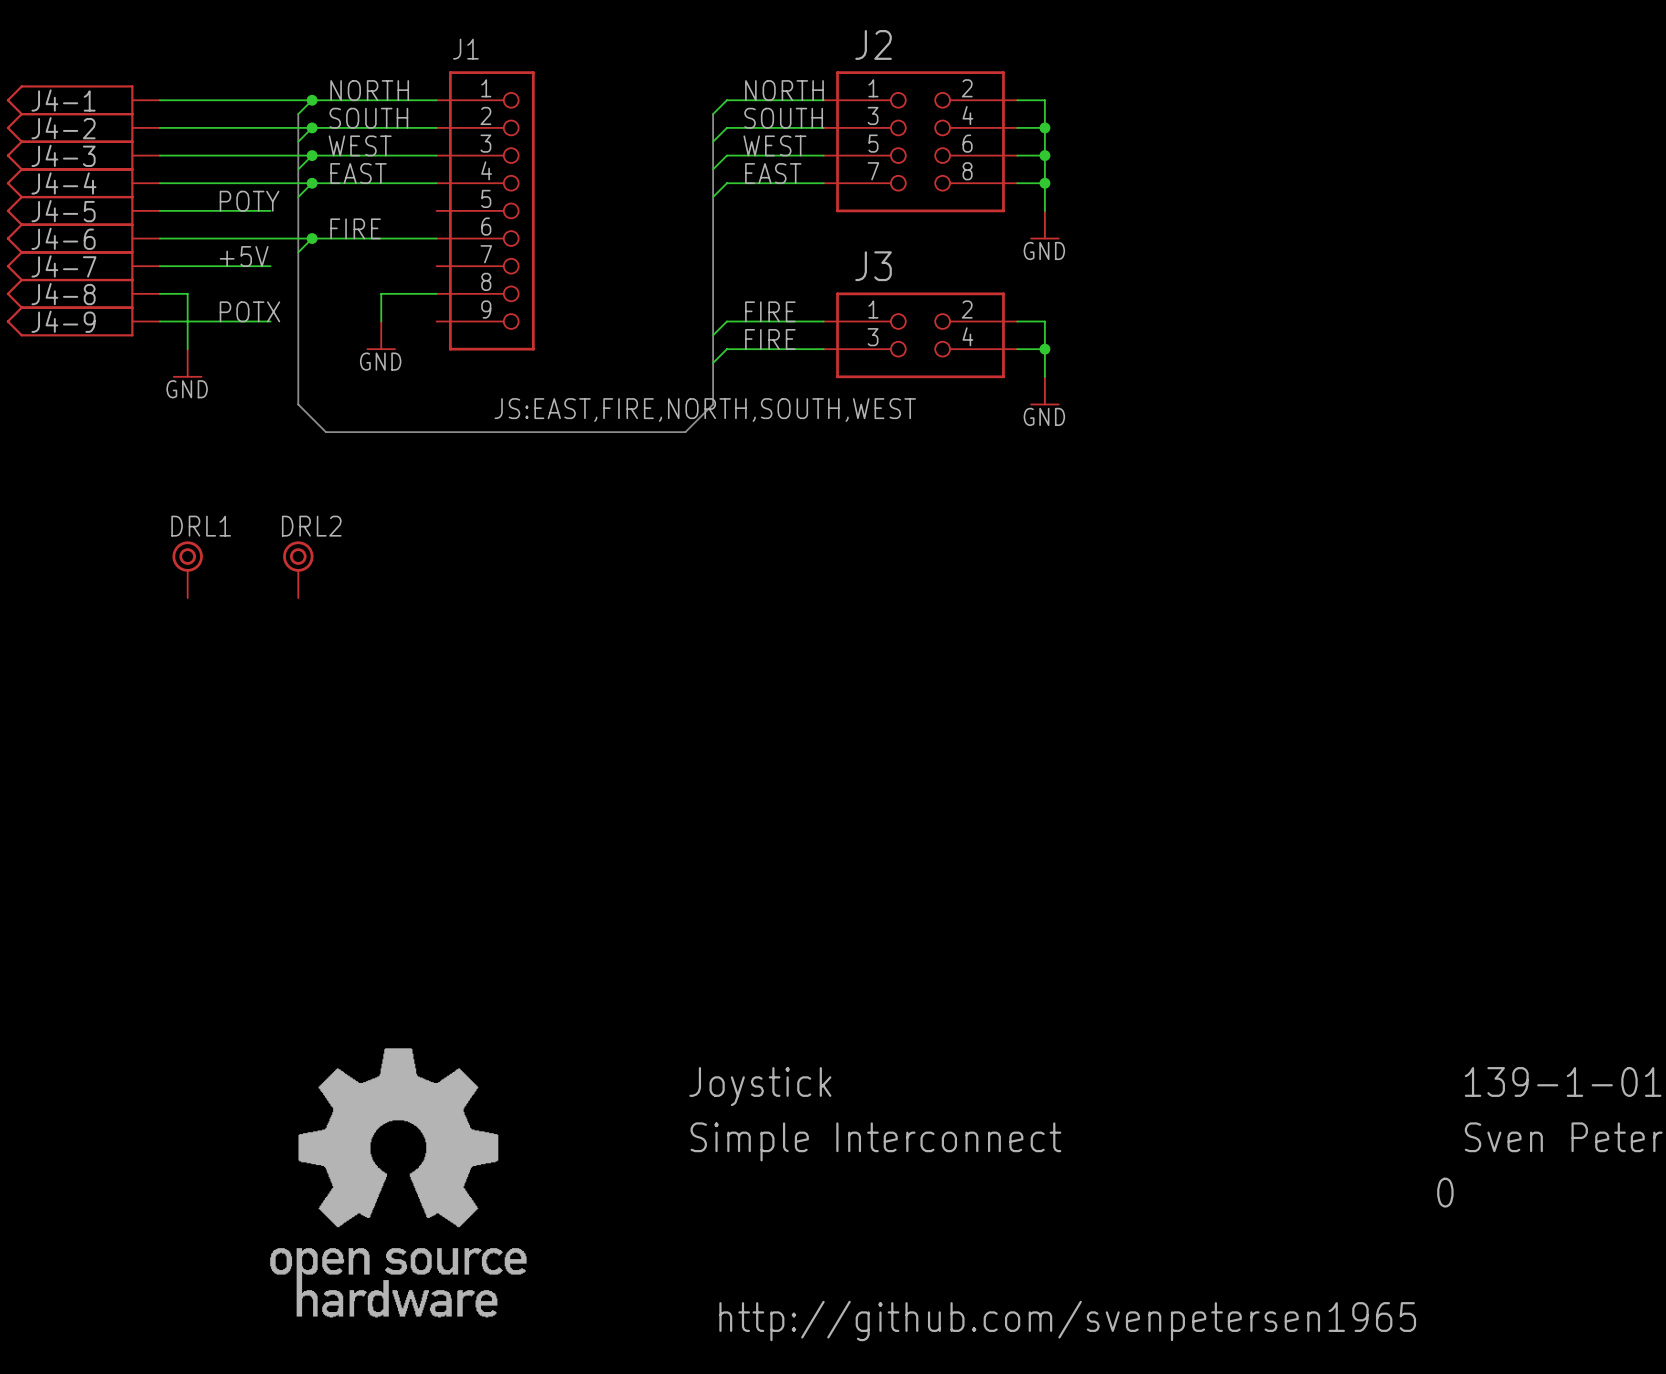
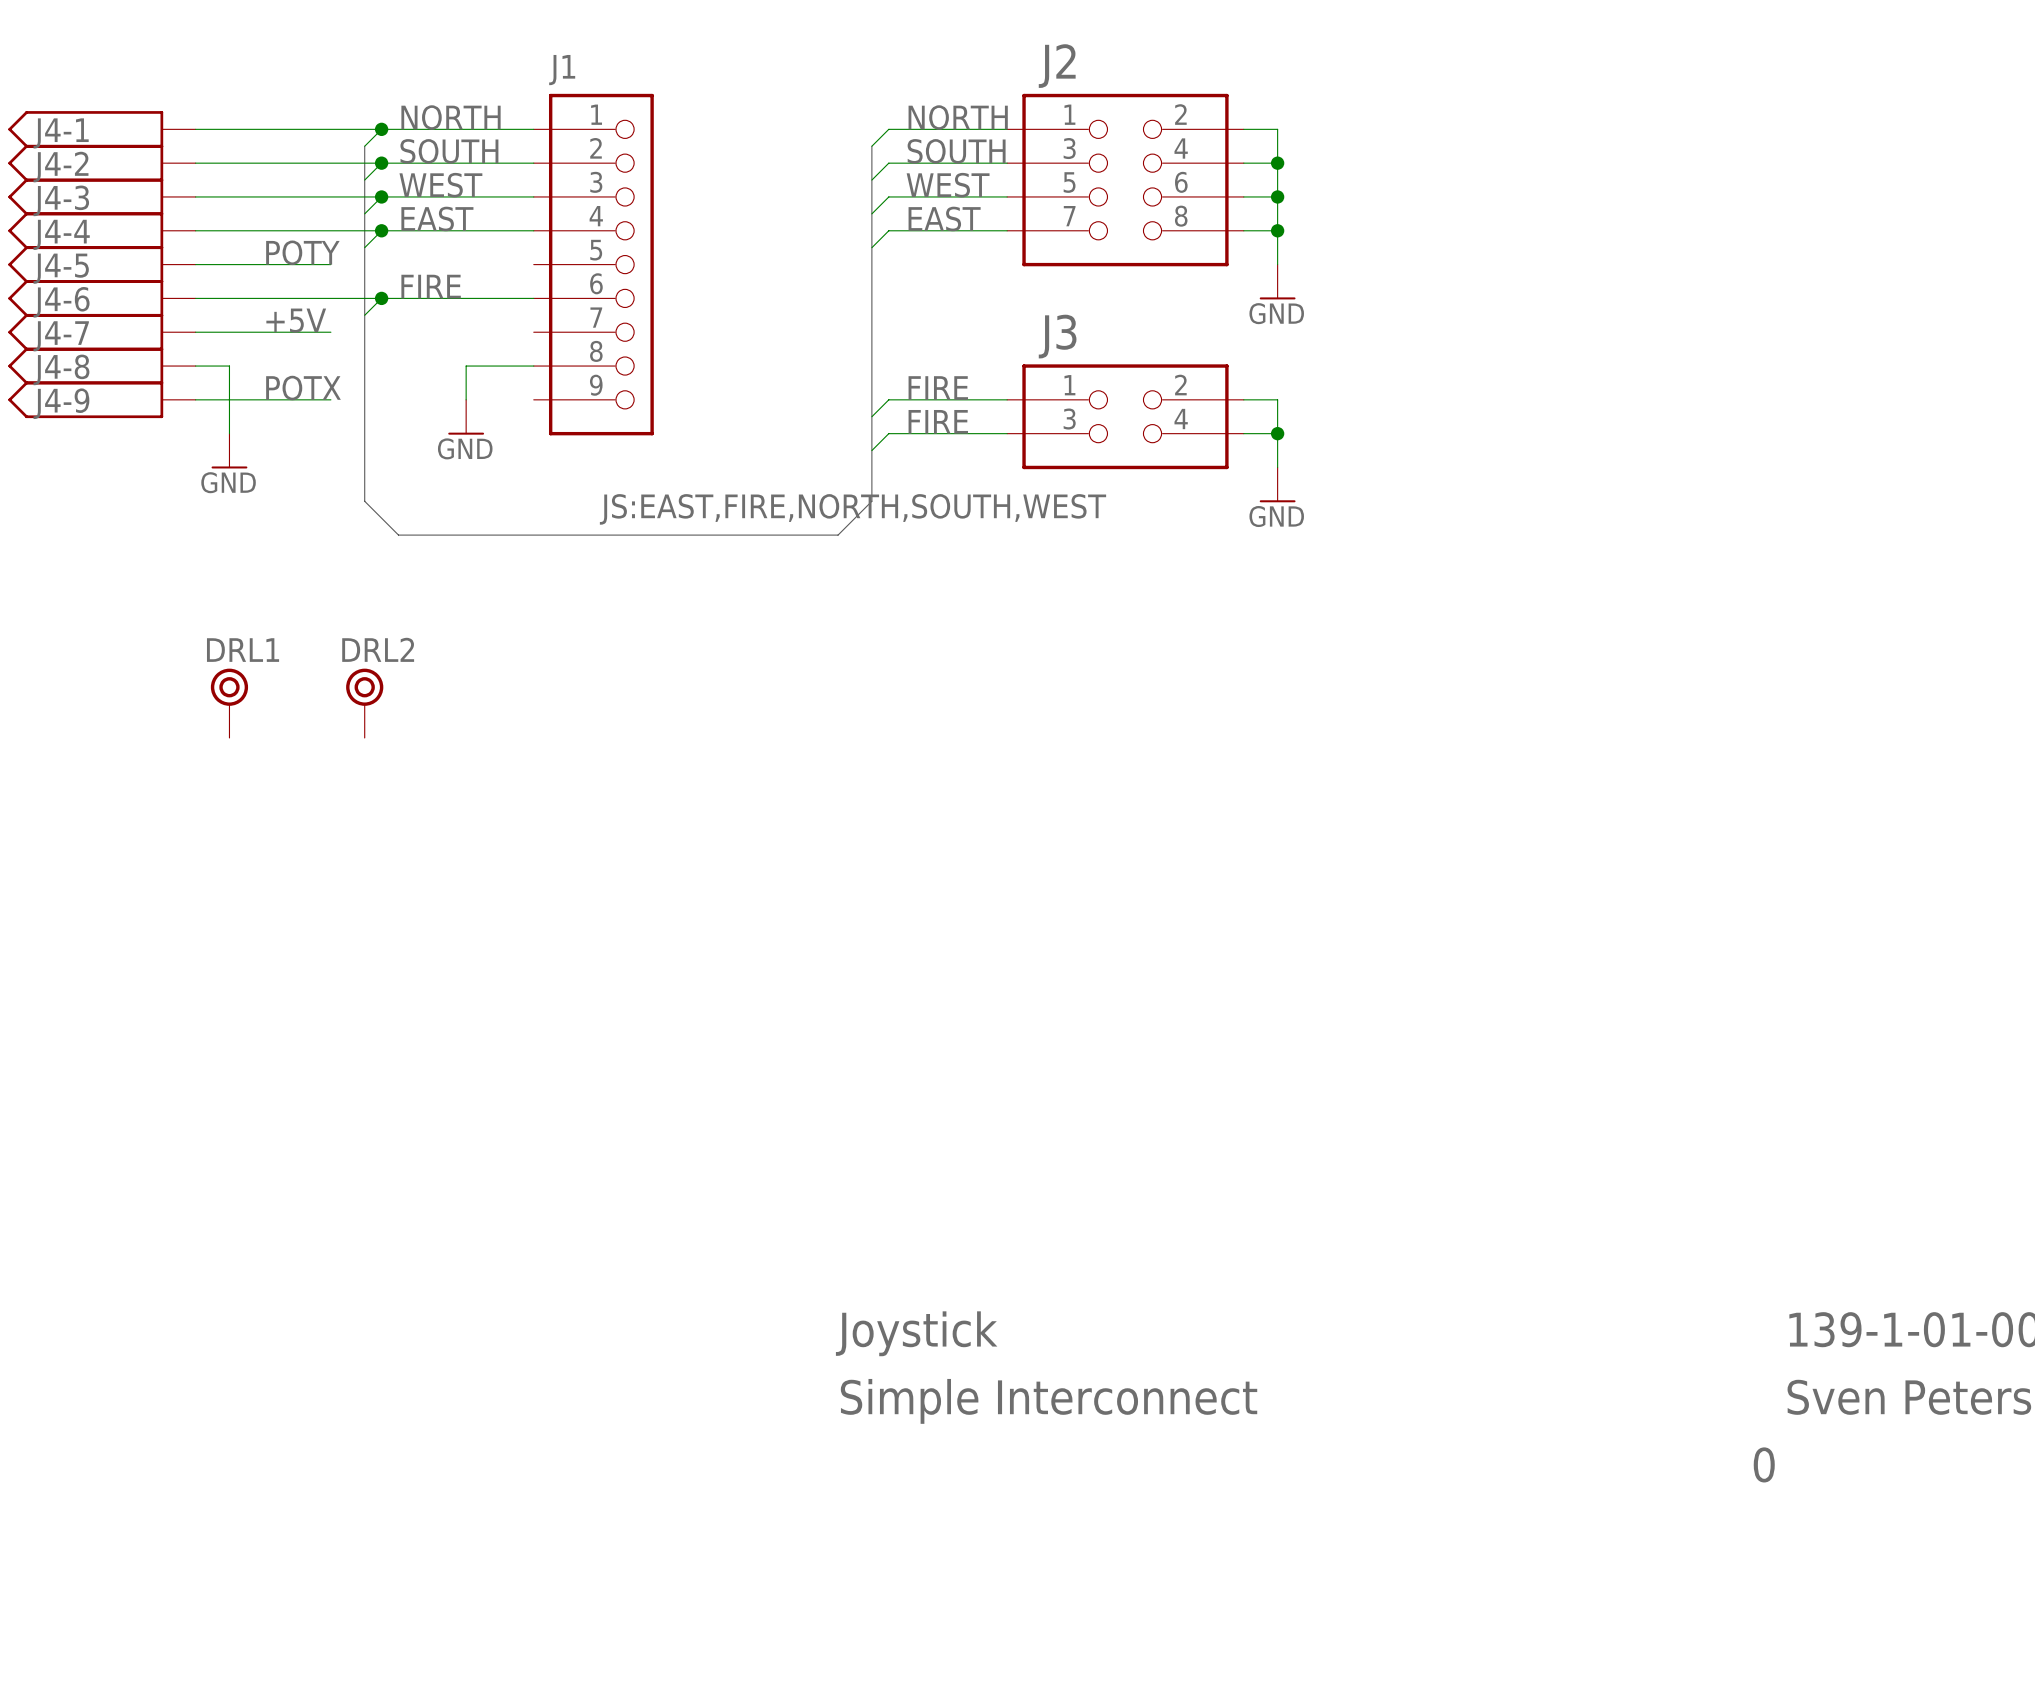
part: (398, 1182) -> none
text: http://github.com/svenpetersen1965 (1067, 1320) -> none

